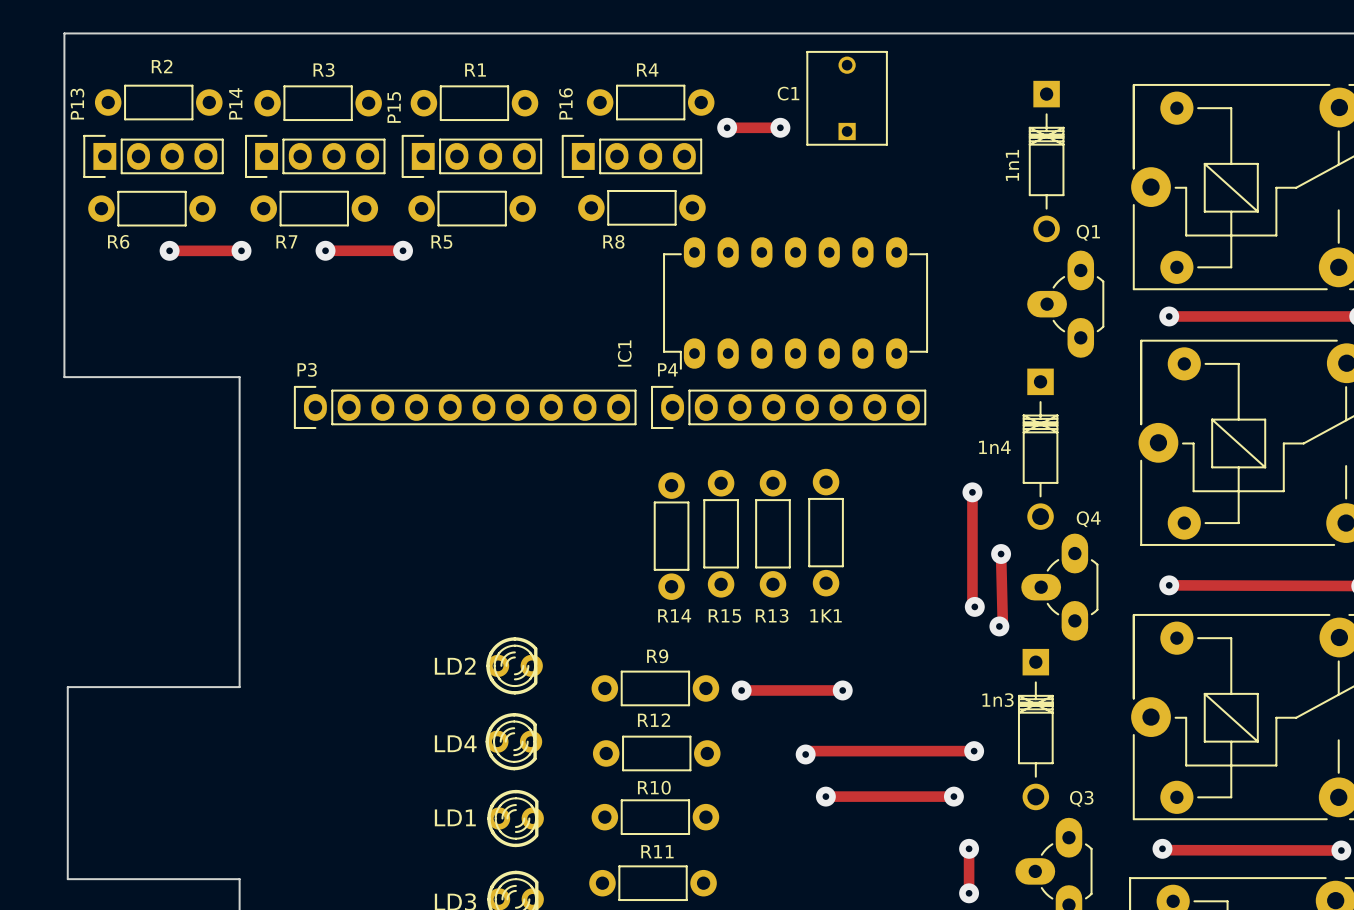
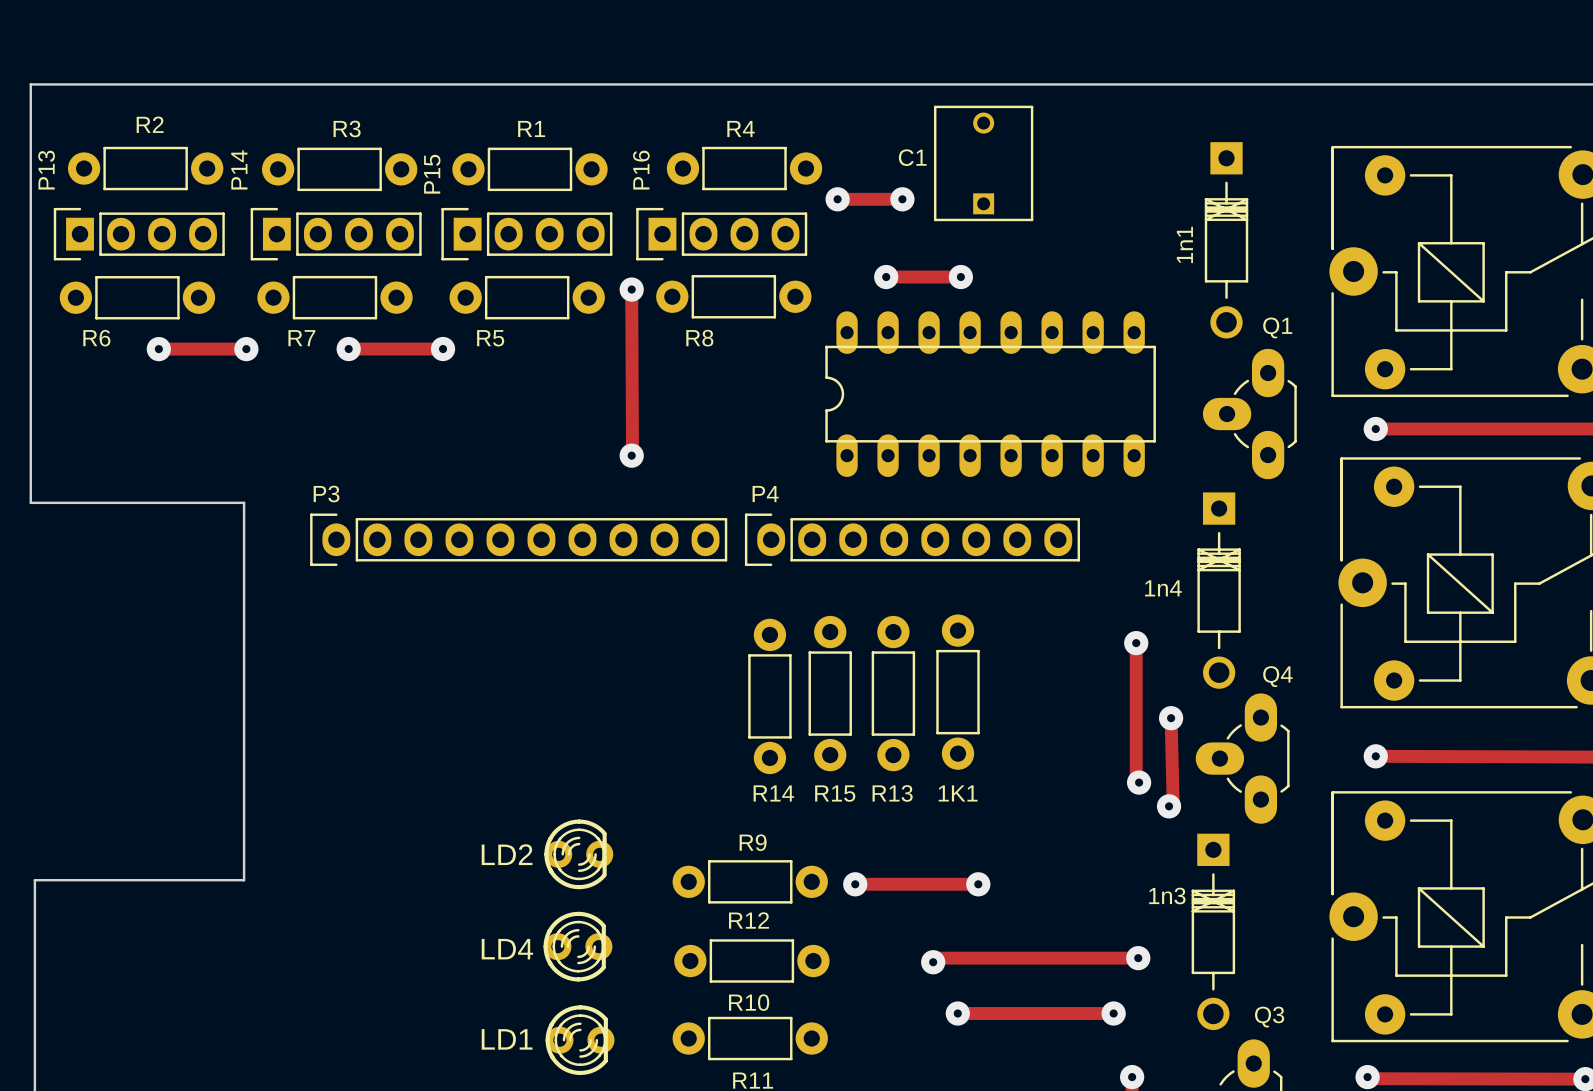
track: none -> (886, 277) (960, 277)
via: none -> (886, 277)
via: none -> (960, 277)
track: none -> (631, 289) (631, 455)
via: none -> (631, 289)
part: none -> (990, 394)
IC1: (795, 303) -> none
via: none -> (631, 455)

